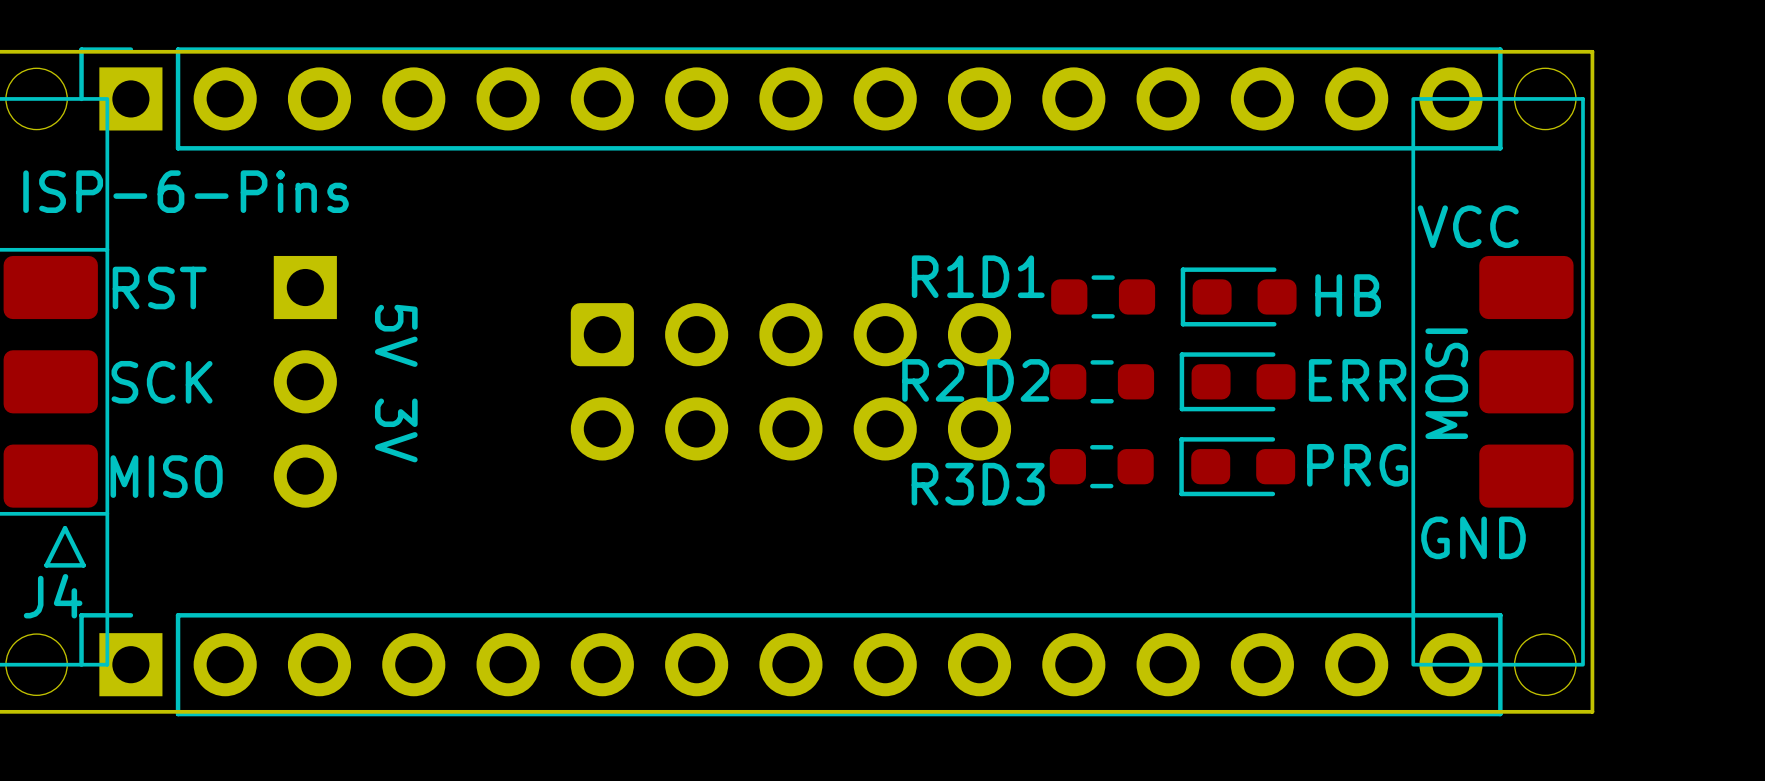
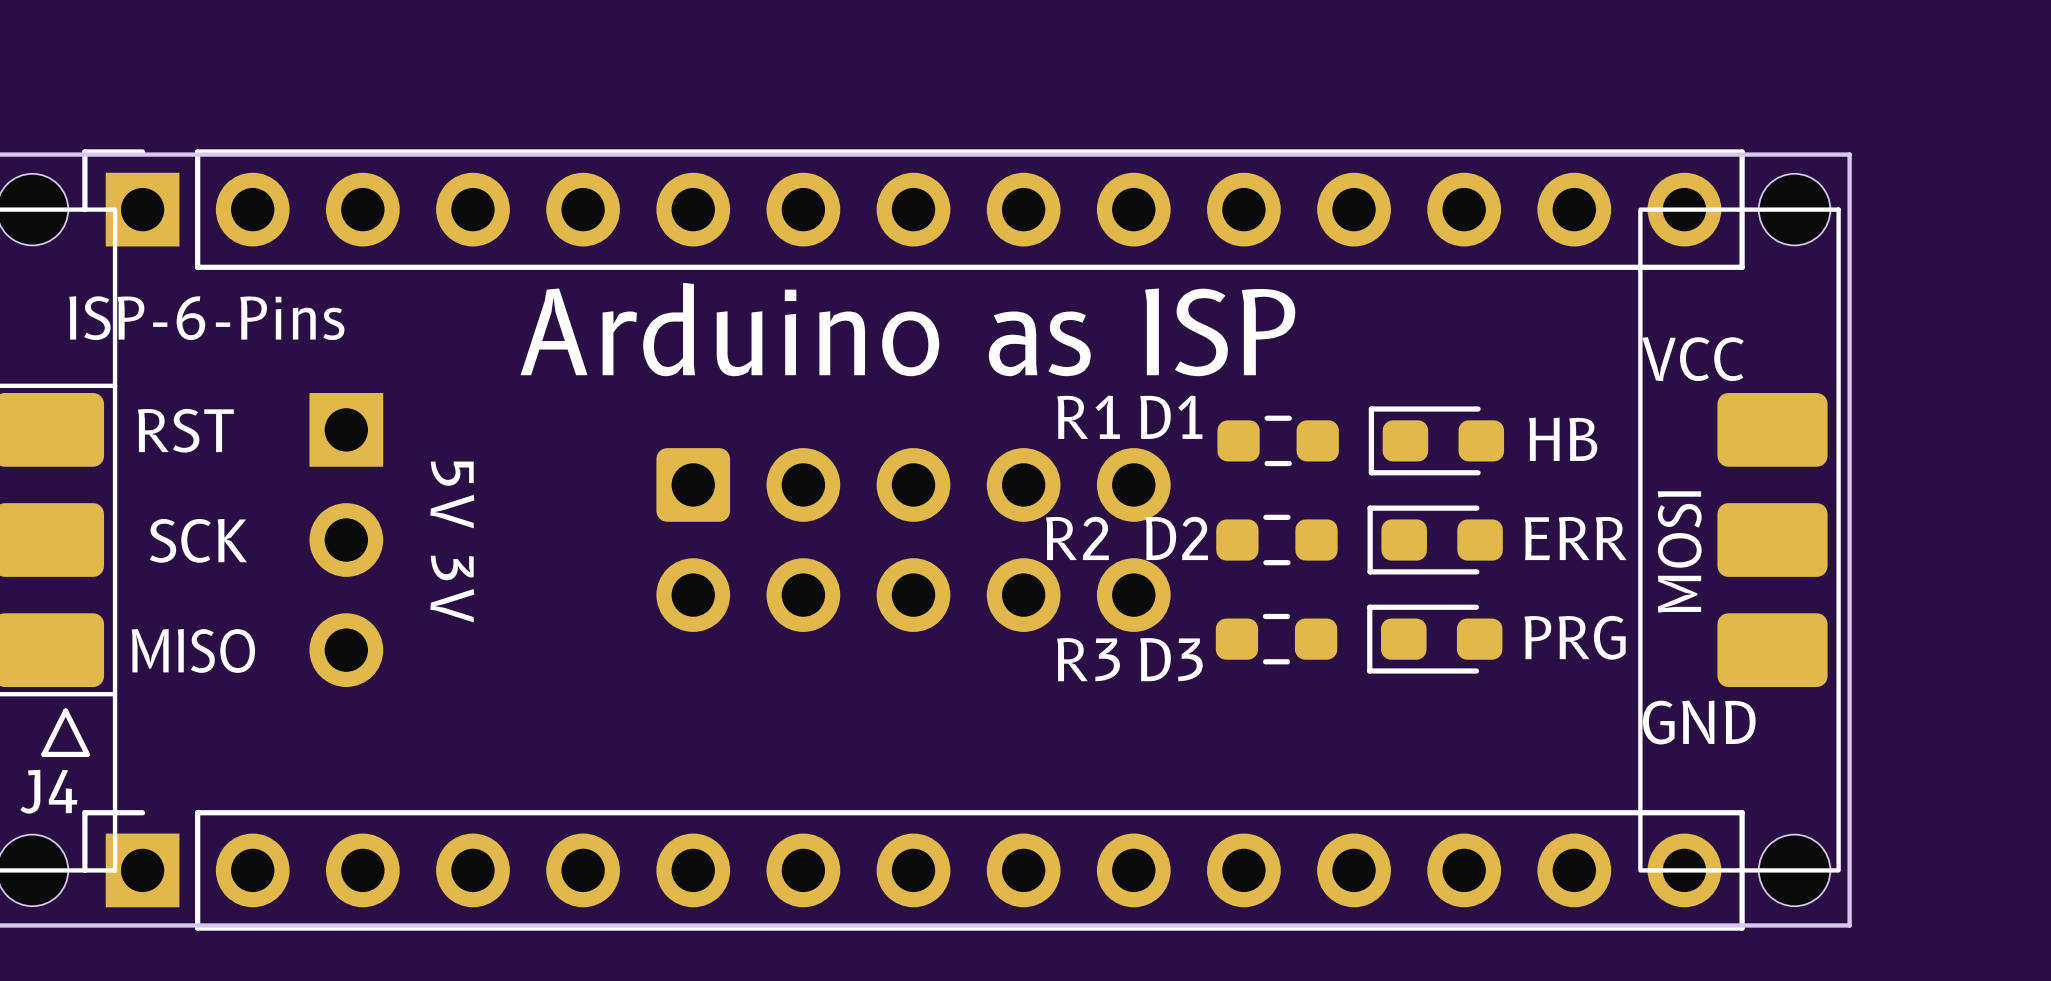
text: none -> Arduino as ISP (907, 329)

